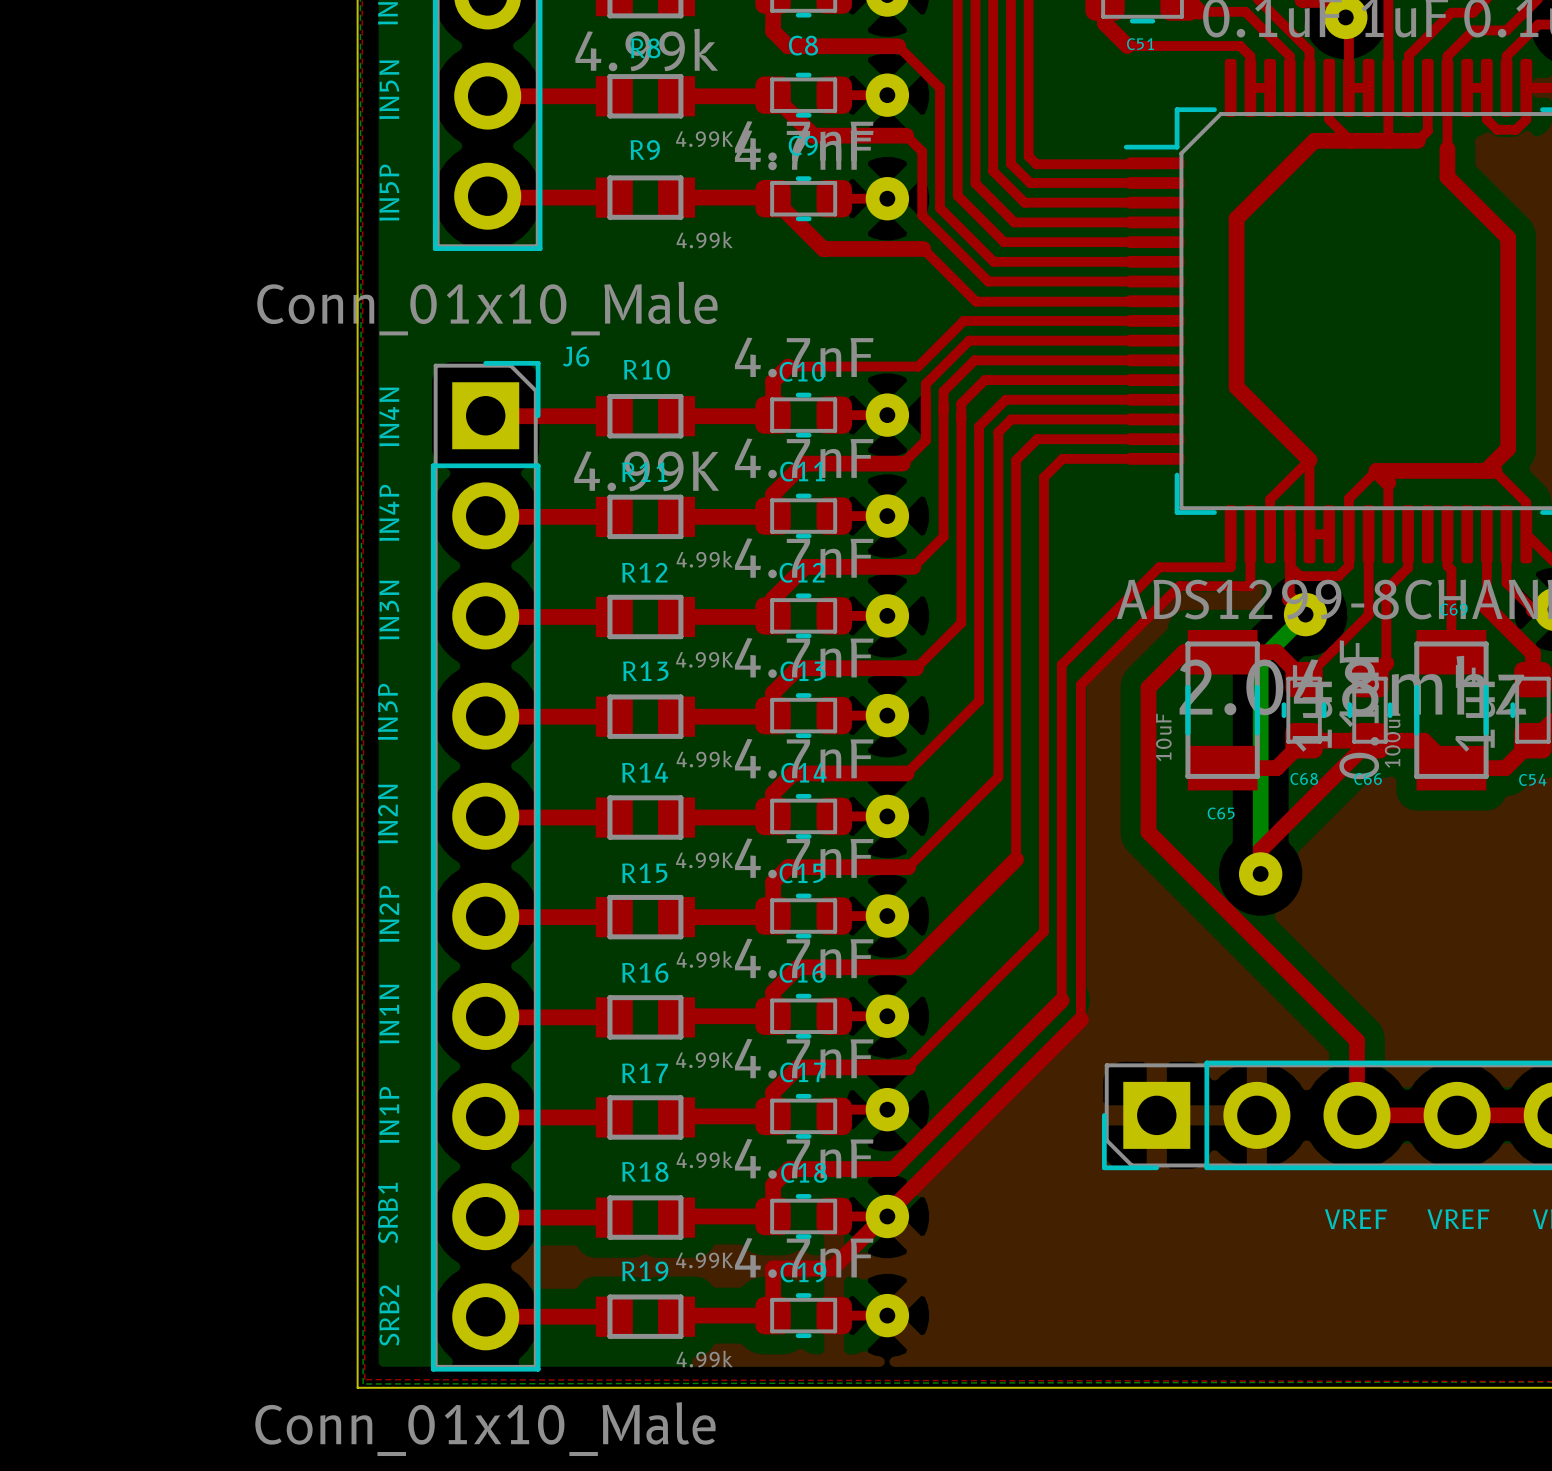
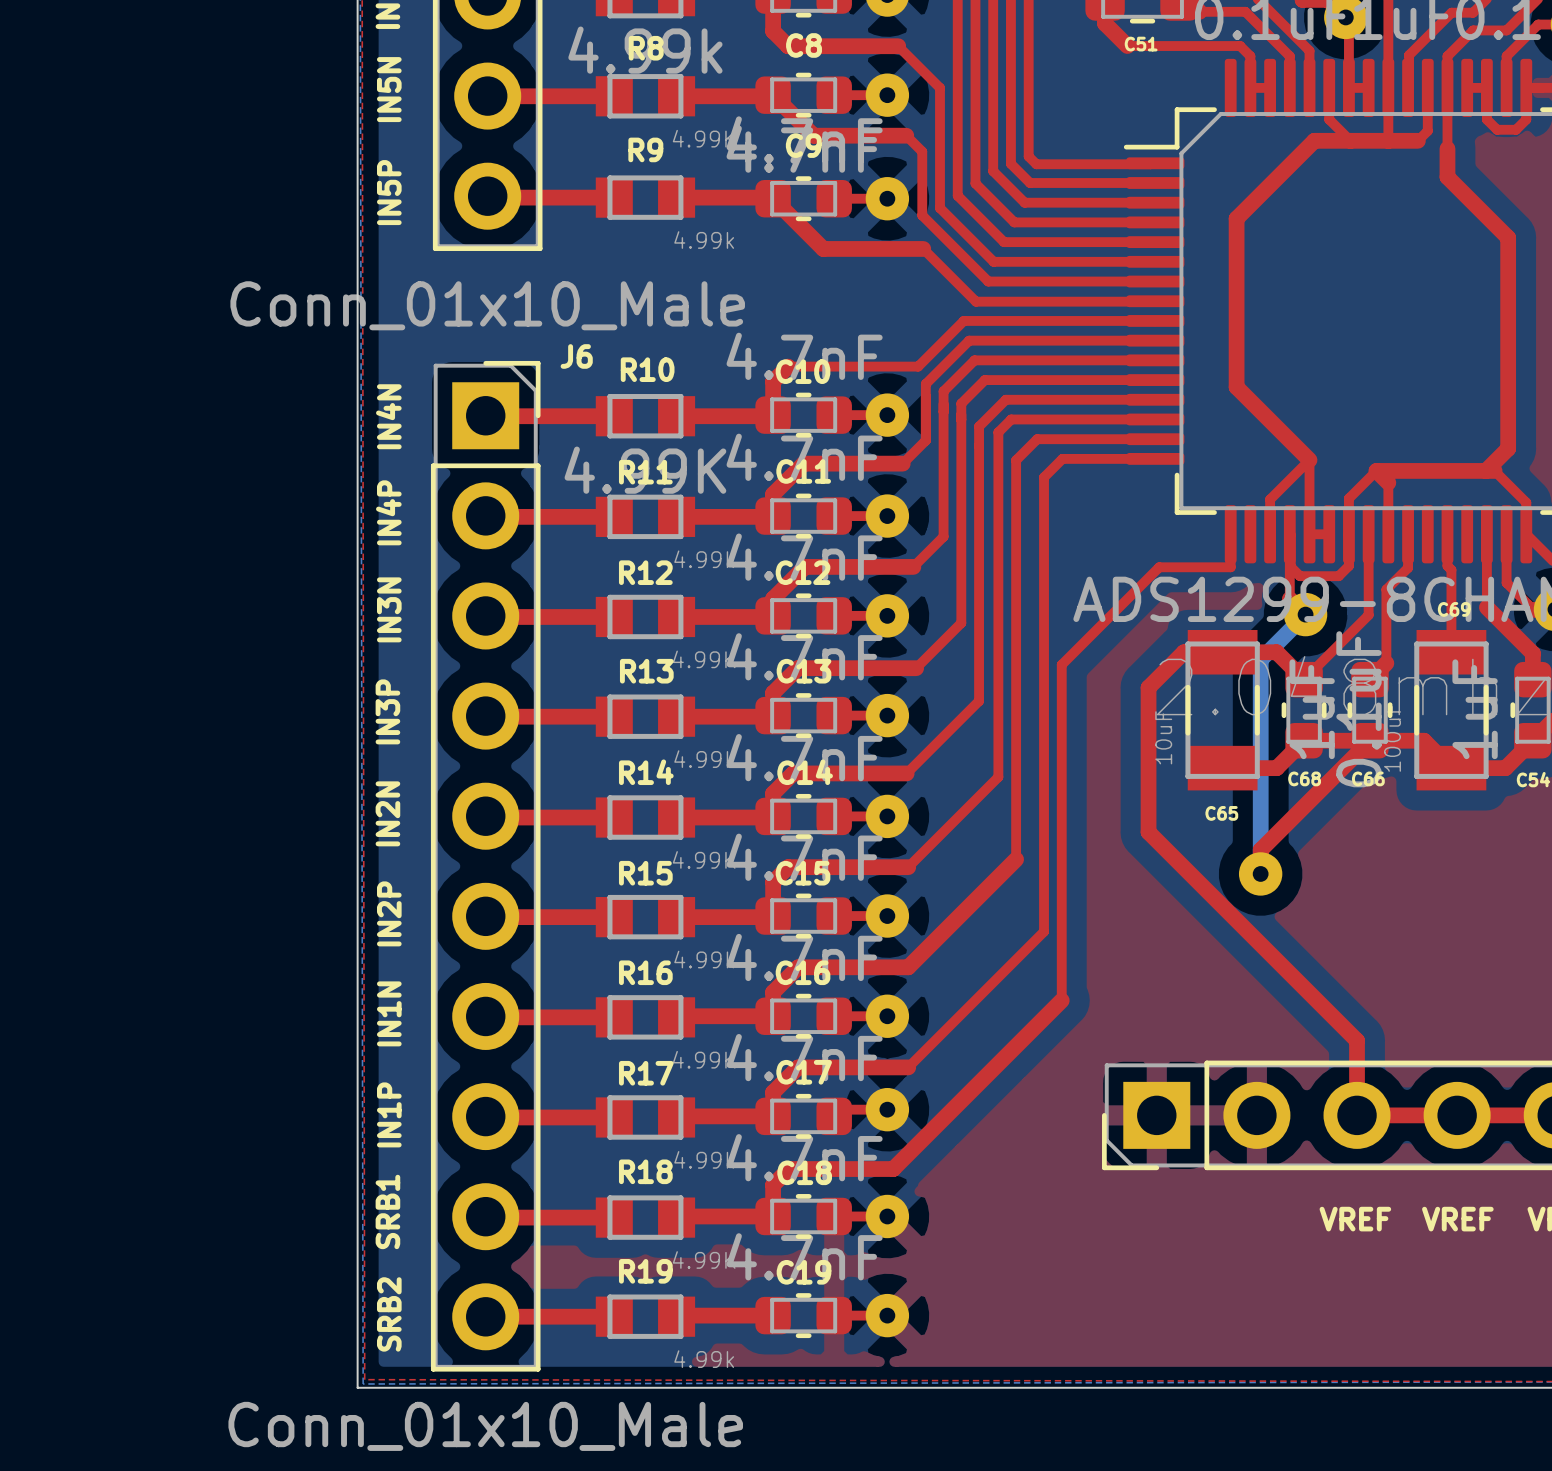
top track: (1250, 534) (1250, 586) (1179, 586) (1080, 684) (1080, 1019) (832, 1268) (773, 1268) (773, 1315) -> none

